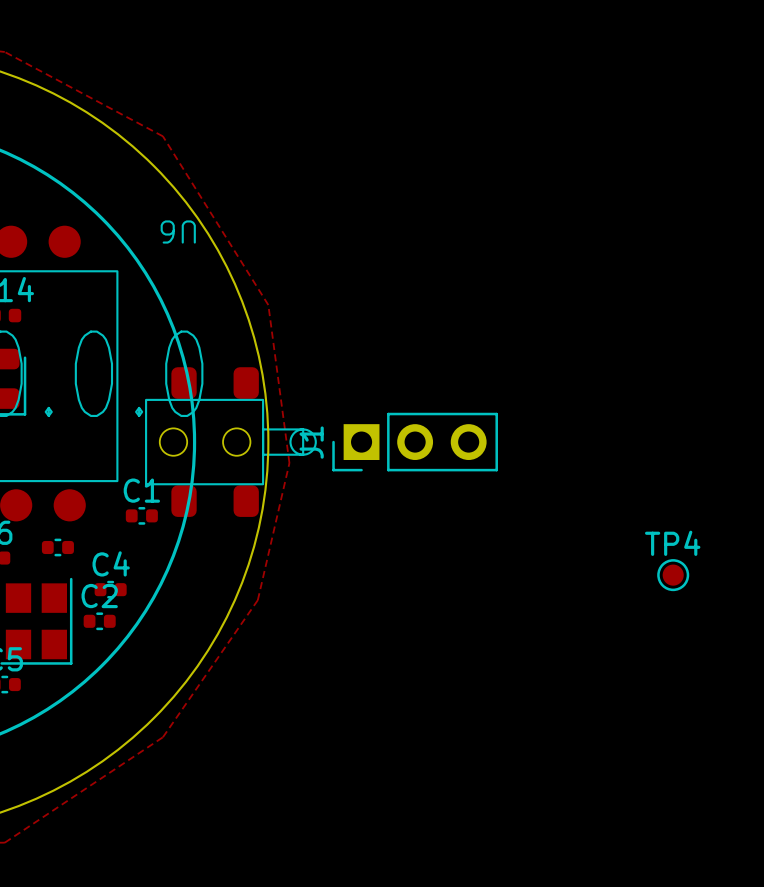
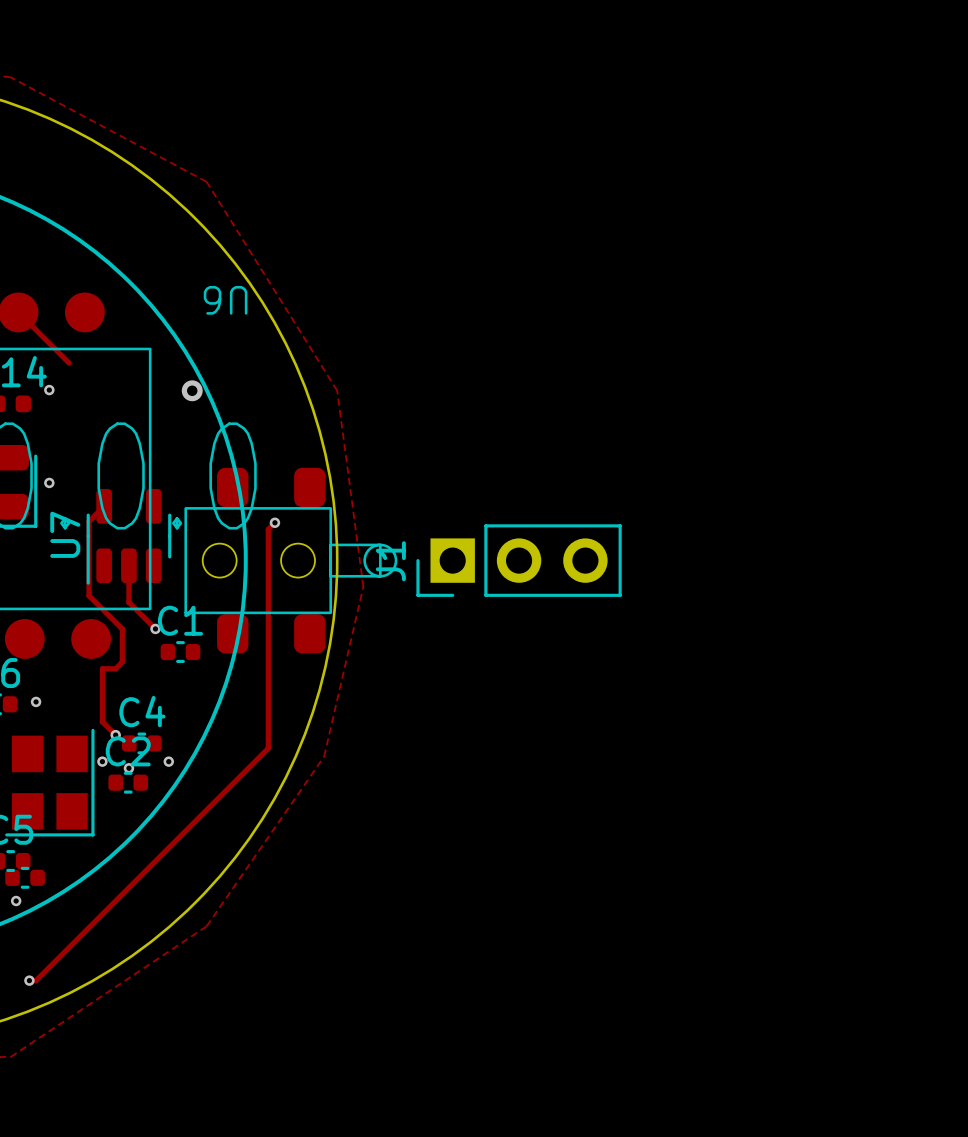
track: none -> (18, 312) (69, 363)
via: none -> (49, 390)
via: none -> (192, 390)
via: none -> (49, 482)
track: none -> (104, 506) (89, 521) (89, 595) (122, 628) (122, 662) (115, 668) (102, 668) (102, 721) (115, 735)
track: none -> (274, 522) (268, 529) (268, 748) (36, 980) (29, 980)
via: none -> (274, 522)
U7: none -> (128, 536)
track: none -> (128, 565) (128, 602) (155, 628)
via: none -> (155, 628)
part position: (57, 547) -> (25, 877)
via: none -> (36, 701)
TP4: (673, 575) -> none
via: none -> (115, 735)
via: none -> (102, 761)
via: none -> (168, 761)
via: none -> (128, 768)
via: none -> (16, 901)
via: none -> (29, 980)

